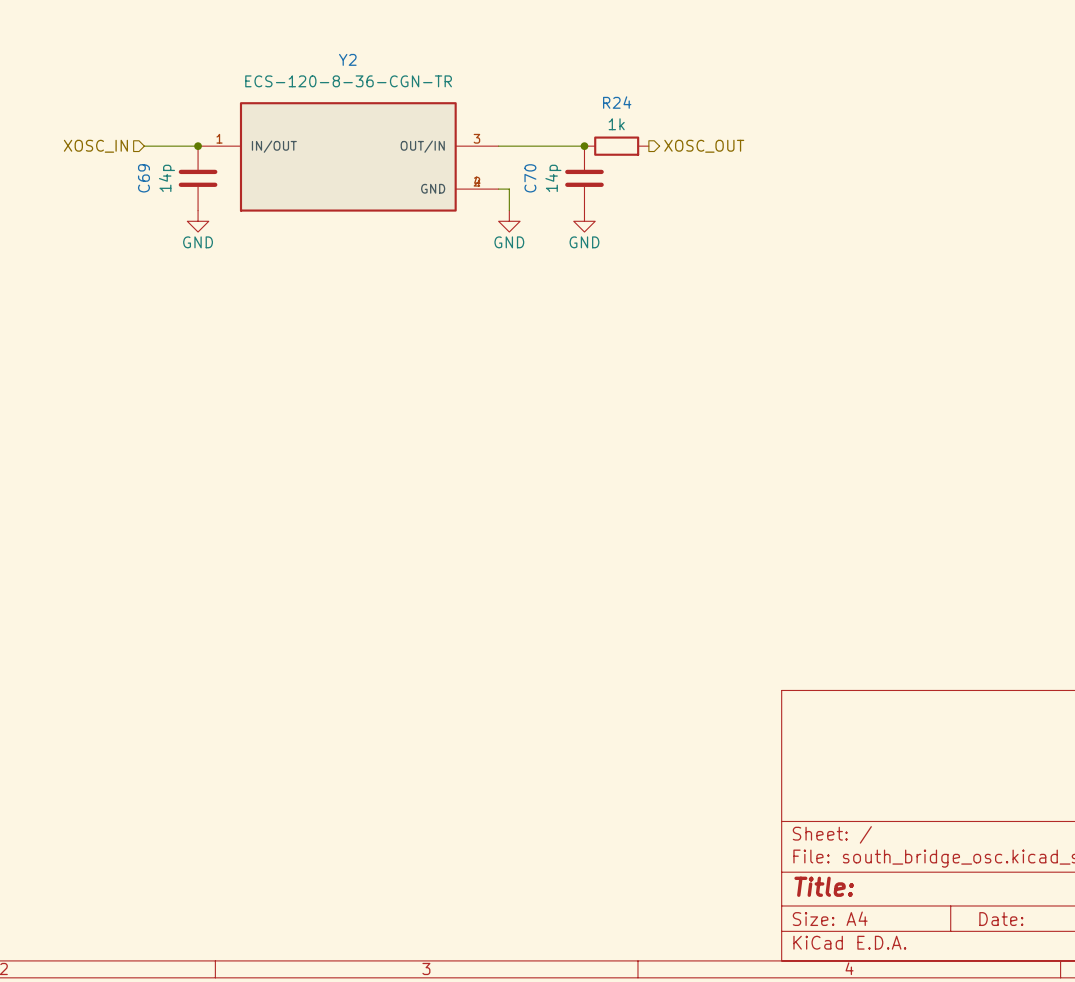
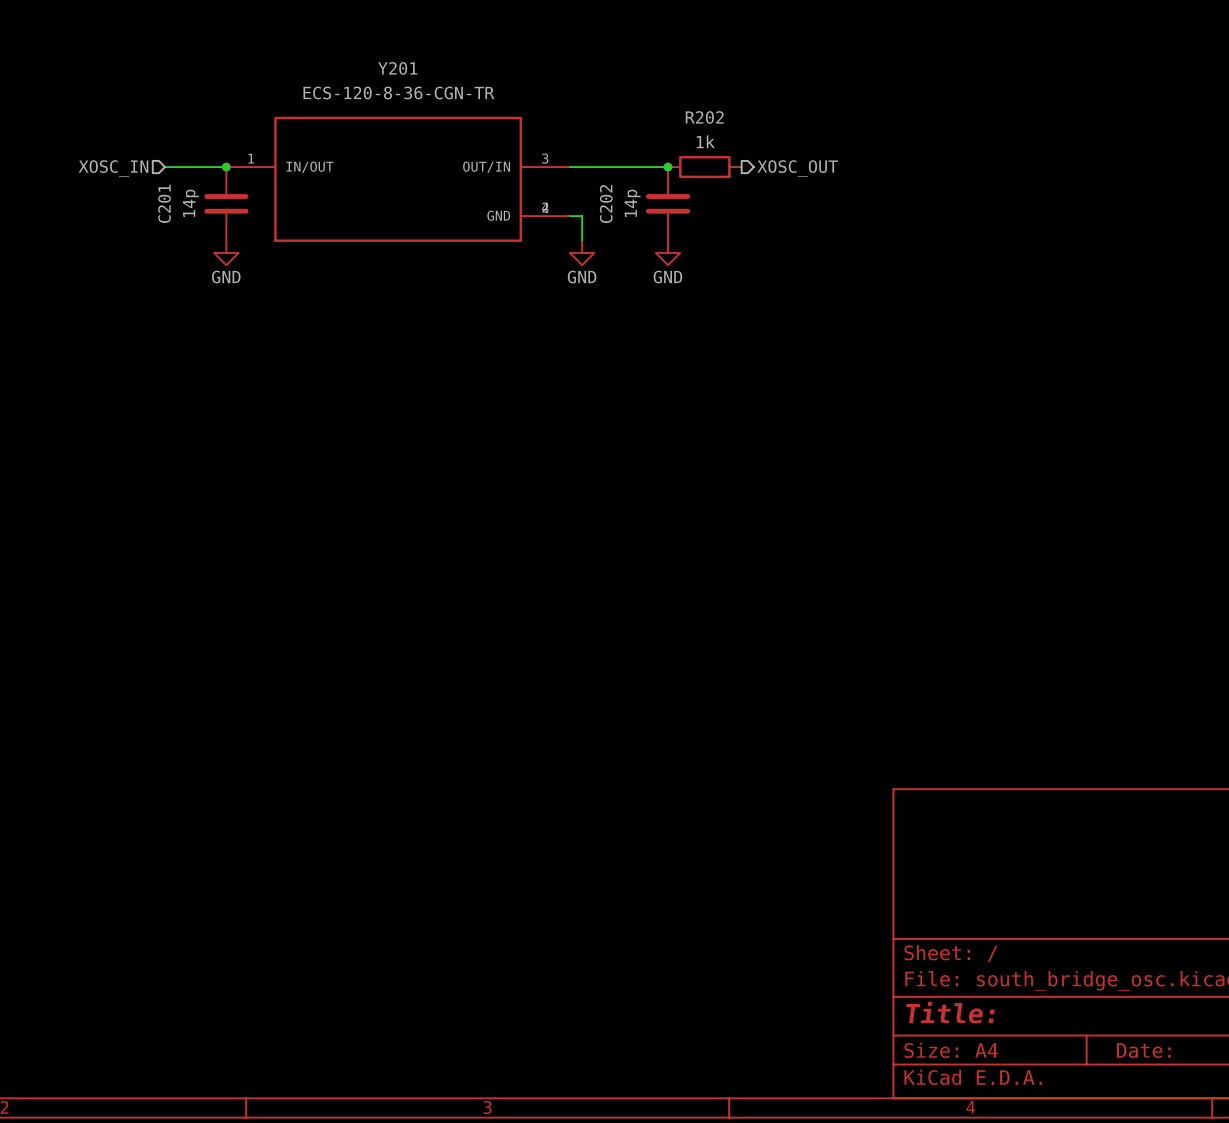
Y2 name: Y2 (347, 59) -> Y201 (397, 68)
R24 name: R24 (617, 102) -> R202 (704, 117)
C69 name: C69 (143, 178) -> C201 (164, 203)
C70 name: C70 (530, 178) -> C202 (606, 204)

